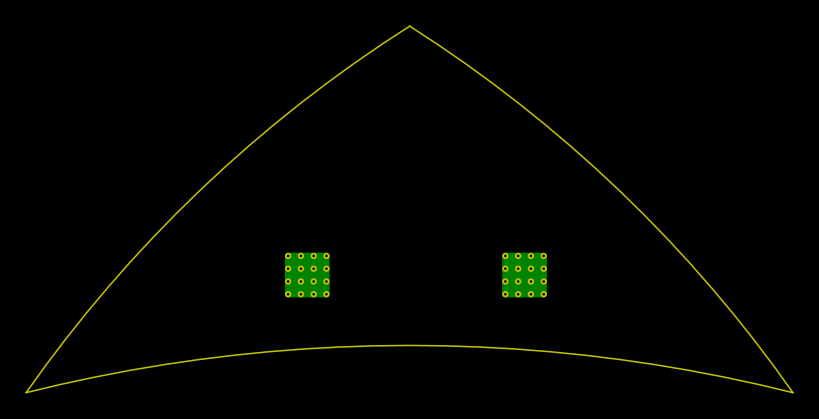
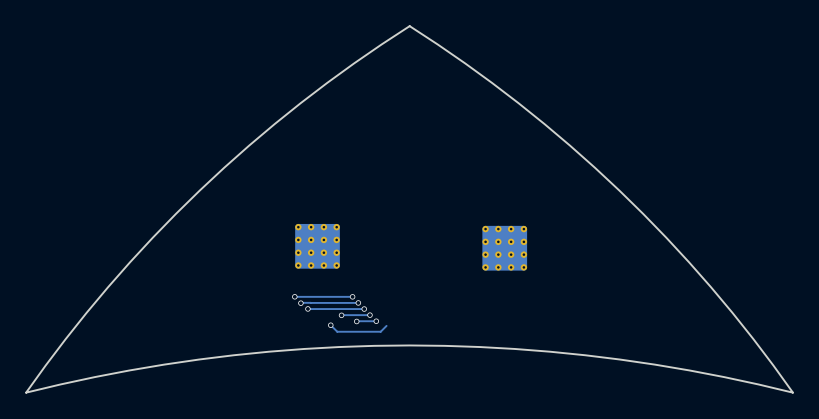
part position: (307, 275) -> (317, 246)
part position: (524, 275) -> (504, 248)
via: none -> (294, 296)
track: none -> (352, 296) (294, 296)
via: none -> (352, 296)
track: none -> (310, 302) (300, 303)
track: none -> (358, 302) (310, 302)
via: none -> (358, 302)
via: none -> (300, 303)
via: none -> (307, 308)
track: none -> (364, 309) (308, 309)
via: none -> (364, 309)
track: none -> (341, 314) (369, 315)
via: none -> (341, 315)
via: none -> (369, 315)
via: none -> (356, 321)
track: none -> (376, 321) (356, 321)
via: none -> (376, 321)
track: none -> (330, 325) (337, 331) (380, 331) (386, 325)
via: none -> (330, 325)

